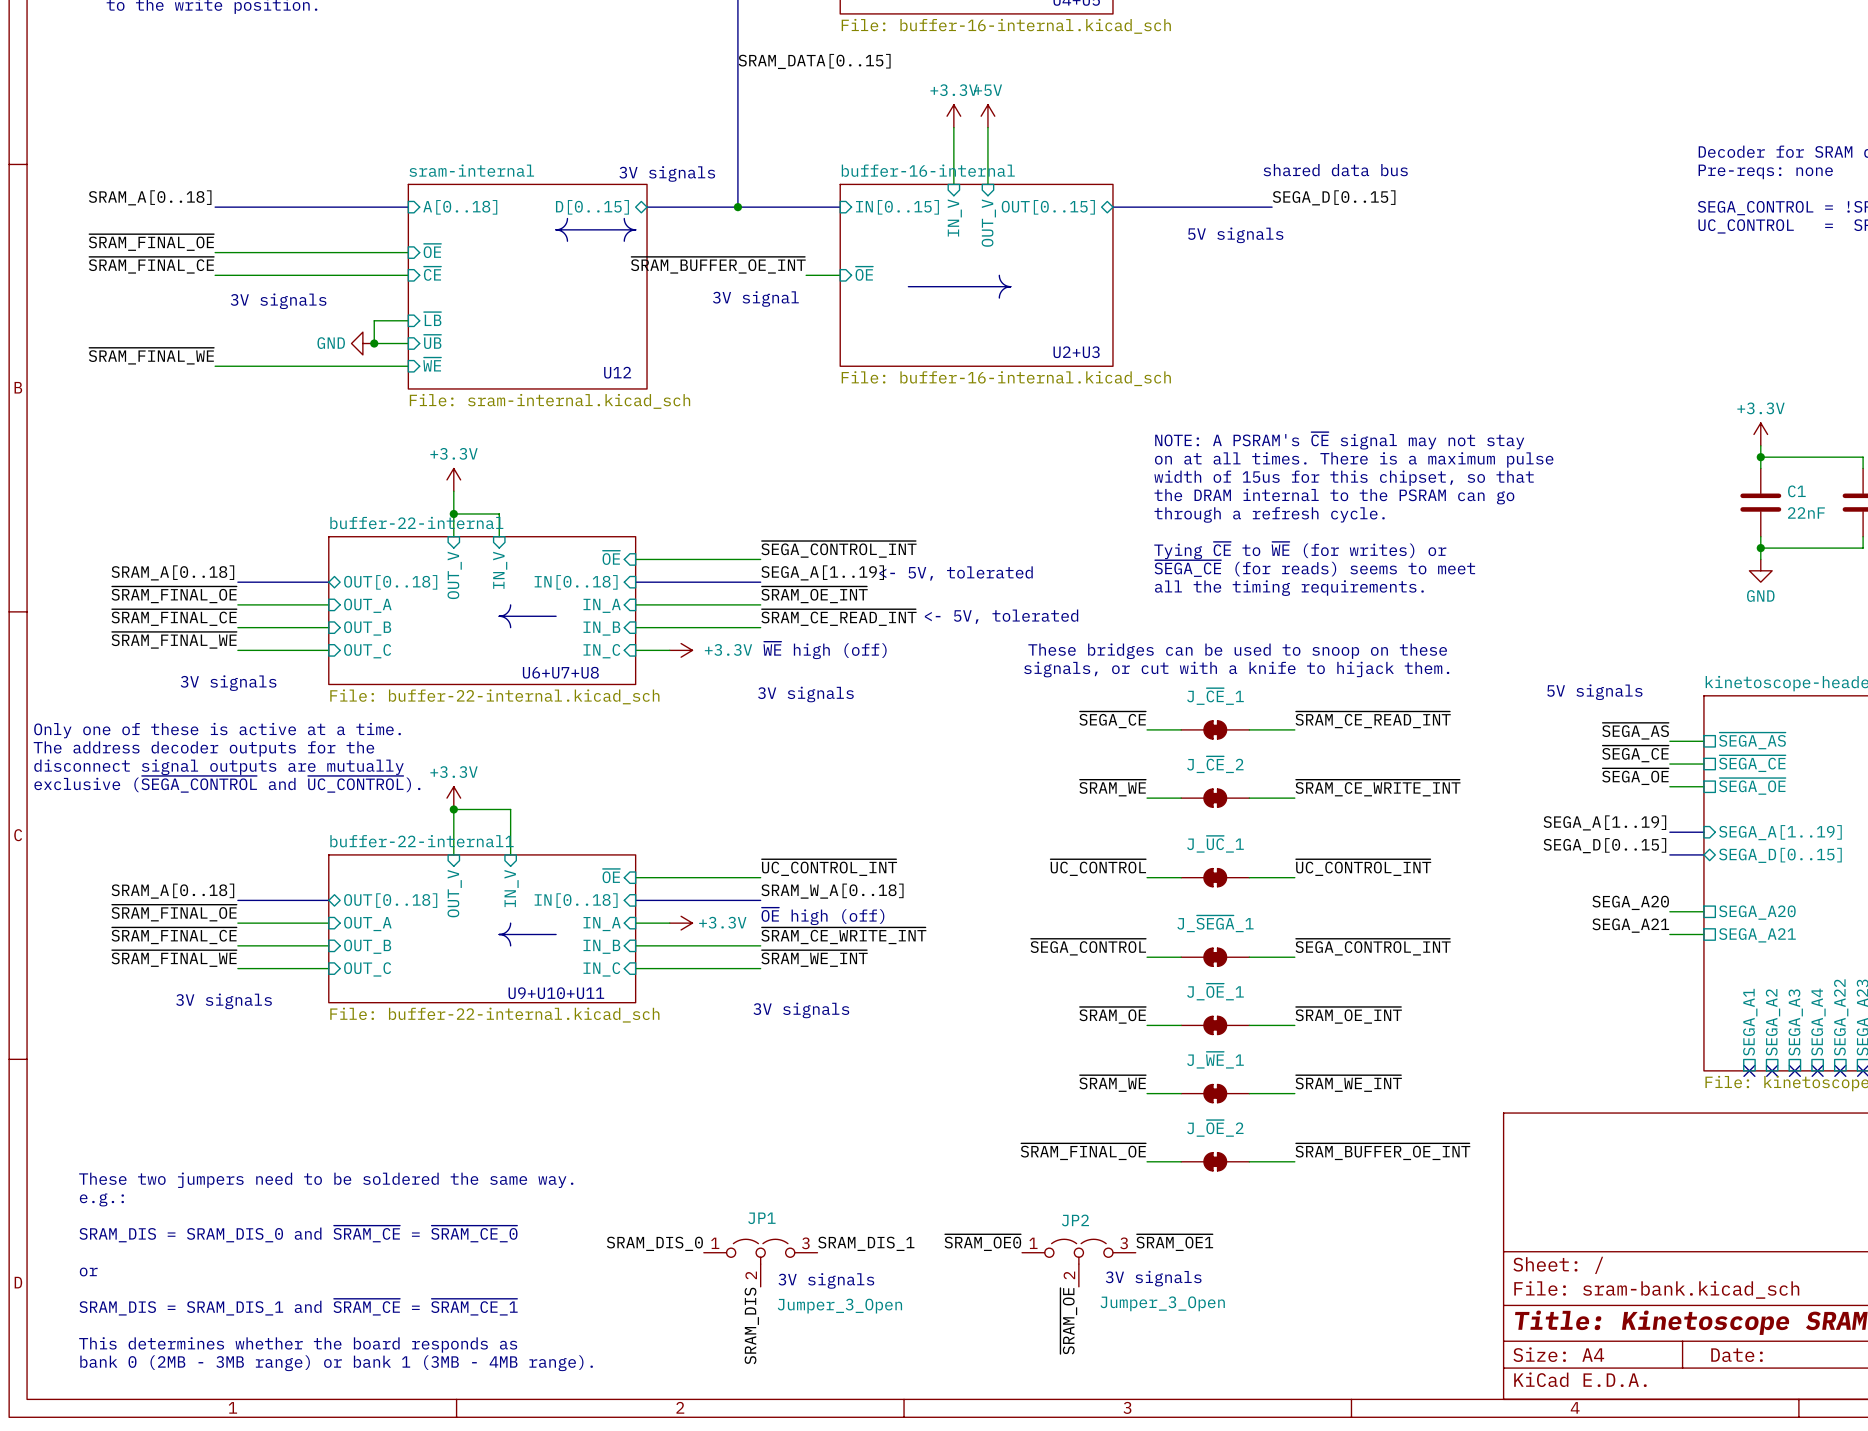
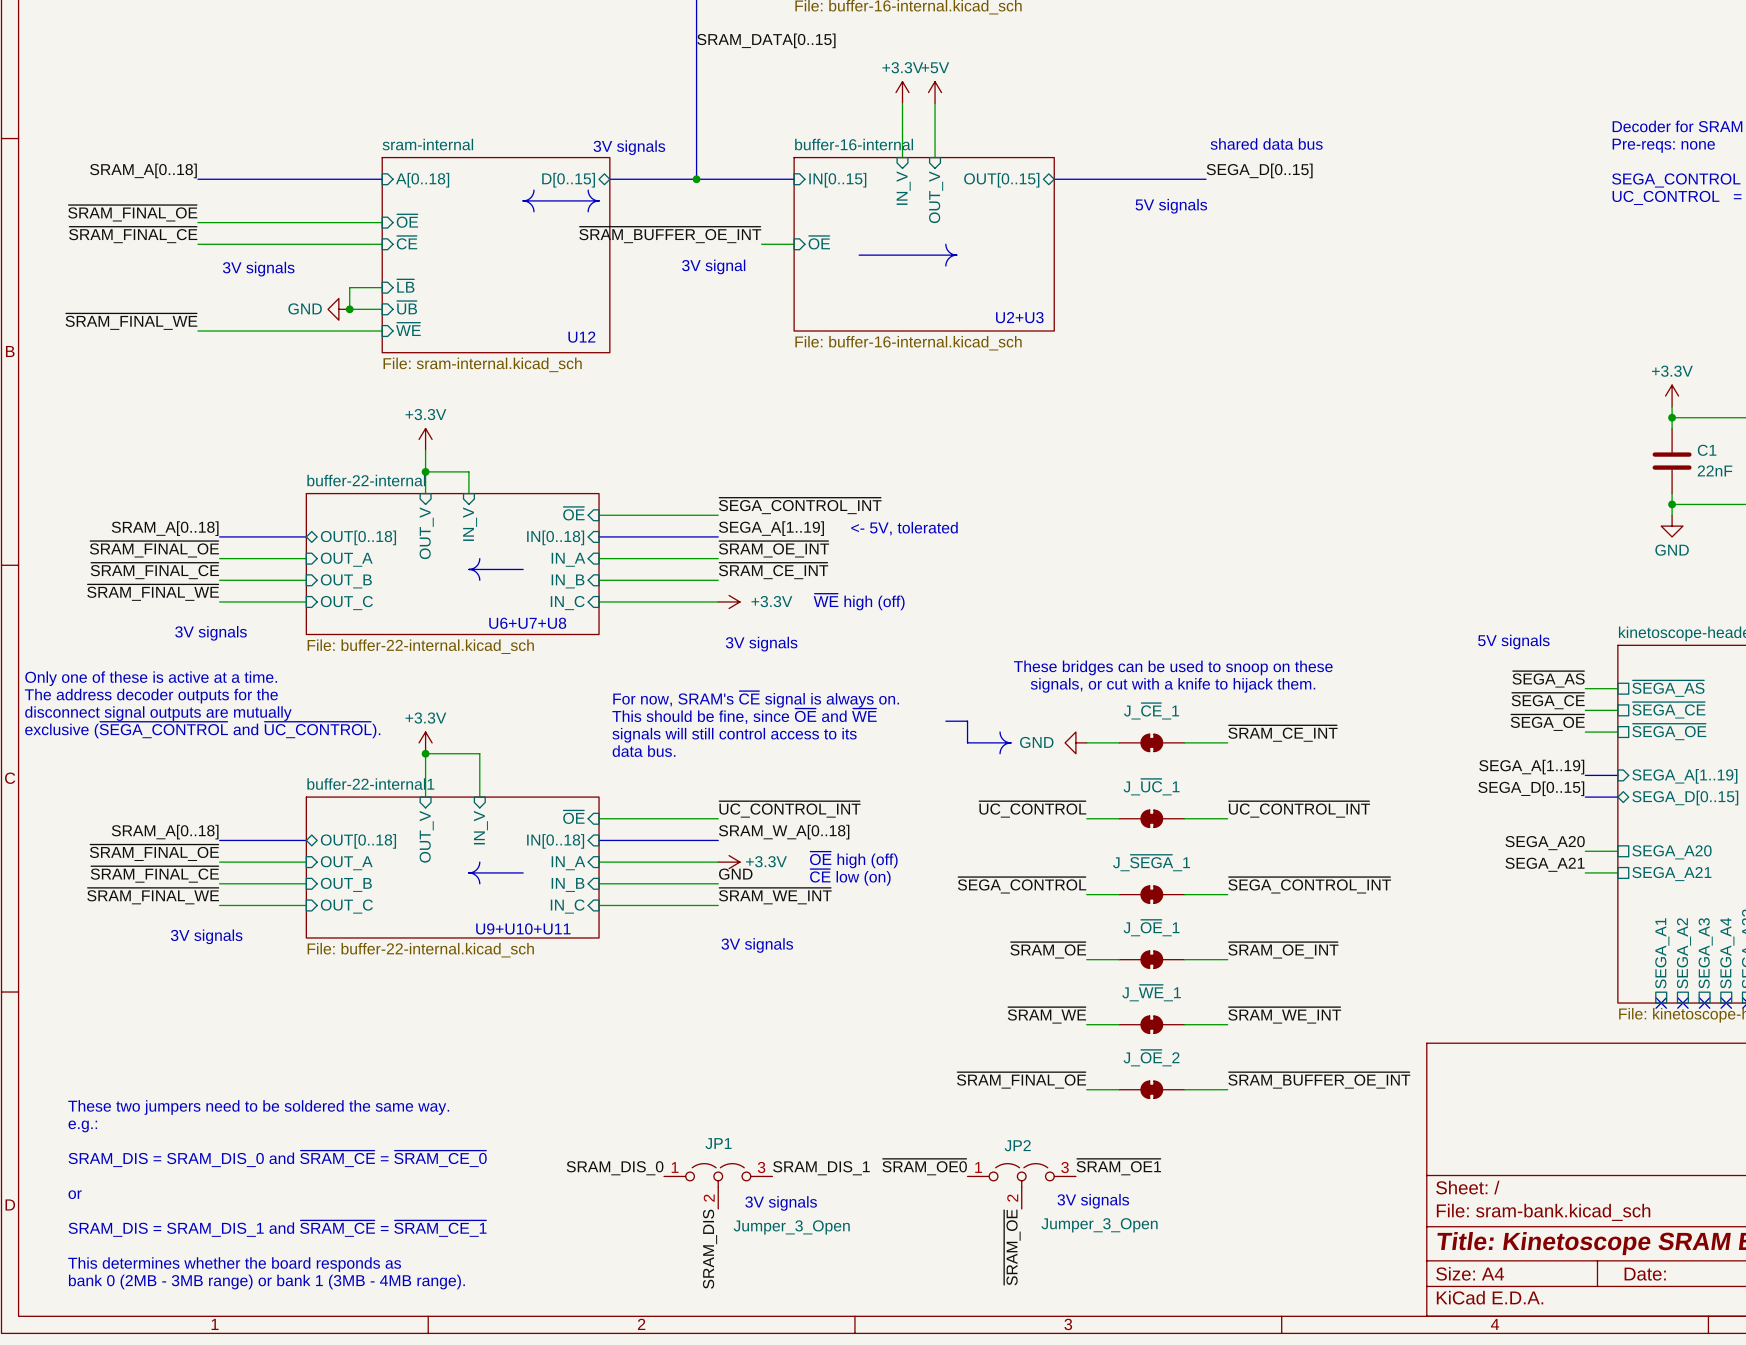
text: NOTE: A PSRAM's ~{CE} signal may not stay (1339, 440) -> none
text: on at all times. There is a maximum pulse (1354, 459) -> none
text: width of 15us for this chipset, so that (1344, 478) -> none
text: the DRAM internal to the PSRAM can go (1334, 496) -> none
text: through a refresh cycle. (1269, 514) -> none
text: Tying ~{CE} to ~{WE} (for writes) or (1300, 550) -> none
text: ~{SEGA_CE} (for reads) seems to meet (1314, 568) -> none
text: all the timing requirements. (1289, 588) -> none
text: <- 5V, tolerated (1001, 616) -> none
label: ~{SRAM_CE_READ_INT} (838, 617) -> ~{SRAM_CE_INT} (773, 570)
wire: none -> (631, 601) (718, 601)
power symbol position: +3.3V (681, 650) -> +3.3V (729, 601)
text position: ~{WE} high (off) (825, 650) -> ~{WE} high (off) (859, 601)
text position: These bridges can be used to snoop on these (1237, 651) -> These bridges can be used to snoop on these (1173, 667)
text position: signals, or cut with a knife to hijack them. (1236, 669) -> signals, or cut with a knife to hijack them. (1172, 685)
label: ~{SEGA_CE} (1112, 719) -> none
label: ~{SRAM_CE_READ_INT} (1373, 719) -> none
wire: (1147, 729) (1181, 729) -> none
J_~{CE}_1: (1215, 729) -> none
wire: (1249, 729) (1294, 729) -> none
text: none -> For now, SRAM's ~{CE} signal is always on. (756, 699)
J_~{CE}_2 name: J_~{CE}_2 (1215, 764) -> J_~{CE}_1 (1151, 711)
text: none -> This should be fine, since ~{OE} and ~{WE} (744, 716)
line: none -> (945, 721) (967, 721) (967, 742) (1010, 742)
line: none -> (1000, 732) (1003, 739) (1010, 742)
label: ~{SRAM_WE} (1112, 788) -> none
label: ~{SRAM_CE_WRITE_INT} (1378, 788) -> ~{SRAM_CE_INT} (1283, 733)
text: none -> signals will still control access to its (734, 735)
line: none -> (1010, 742) (1003, 746) (1000, 753)
power symbol: none -> GND (1075, 742)
text: none -> data bus. (644, 751)
text position: ~{OE} high (off) (822, 916) -> ~{OE} high (off) (853, 859)
wire: none -> (631, 862) (718, 862)
power symbol position: +3.3V (681, 923) -> +3.3V (729, 862)
label: ~{SRAM_CE_WRITE_INT} (843, 935) -> GND (735, 874)
text: none -> ~{CE} low (on) (850, 877)

